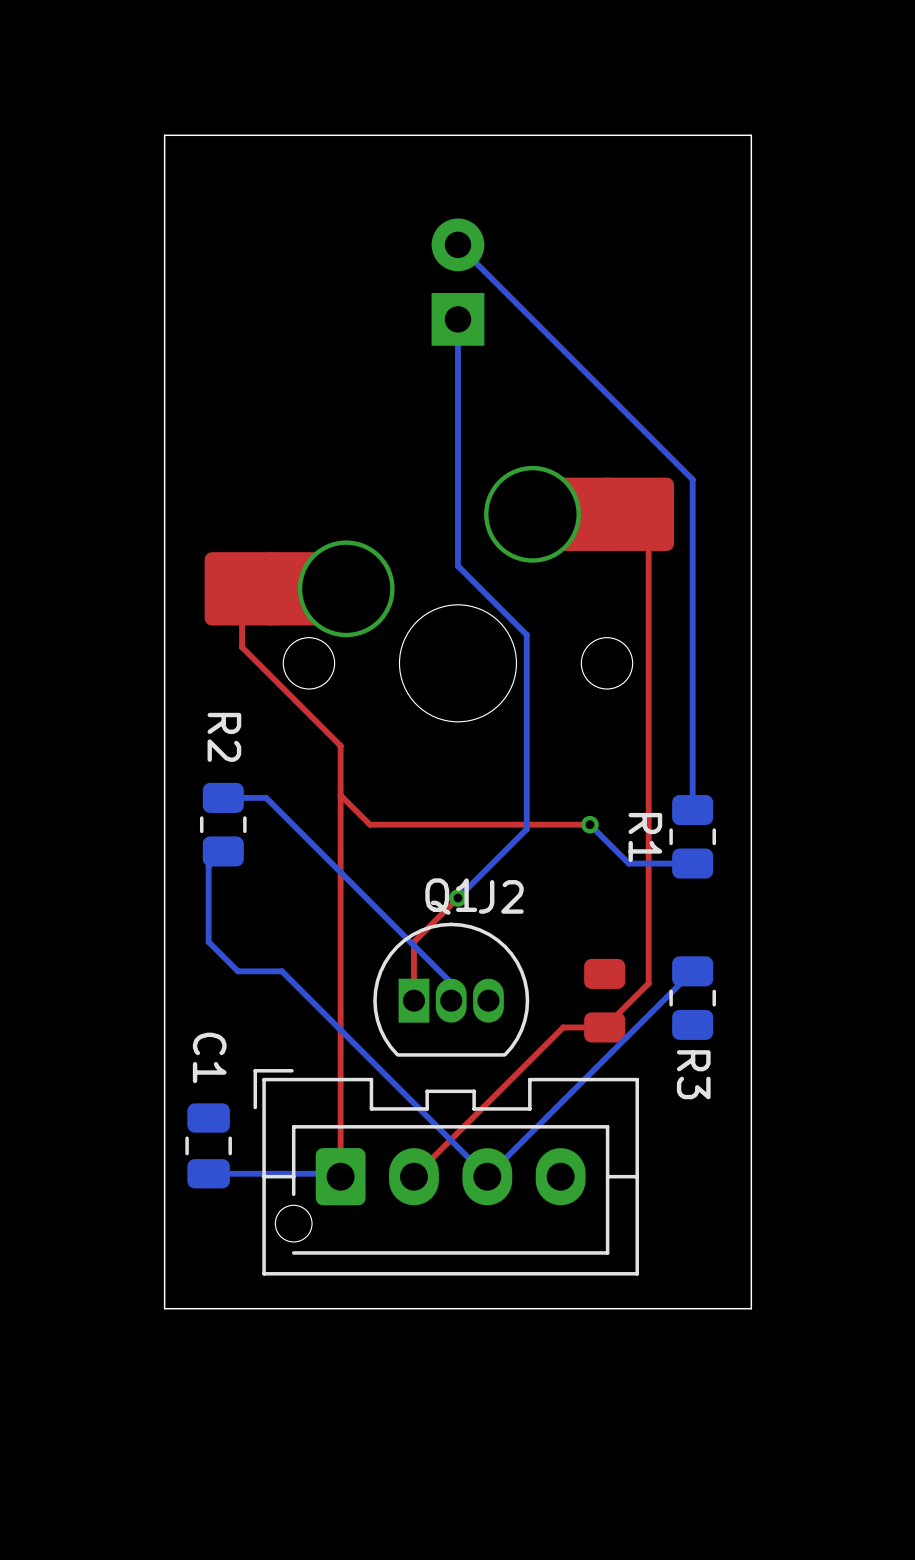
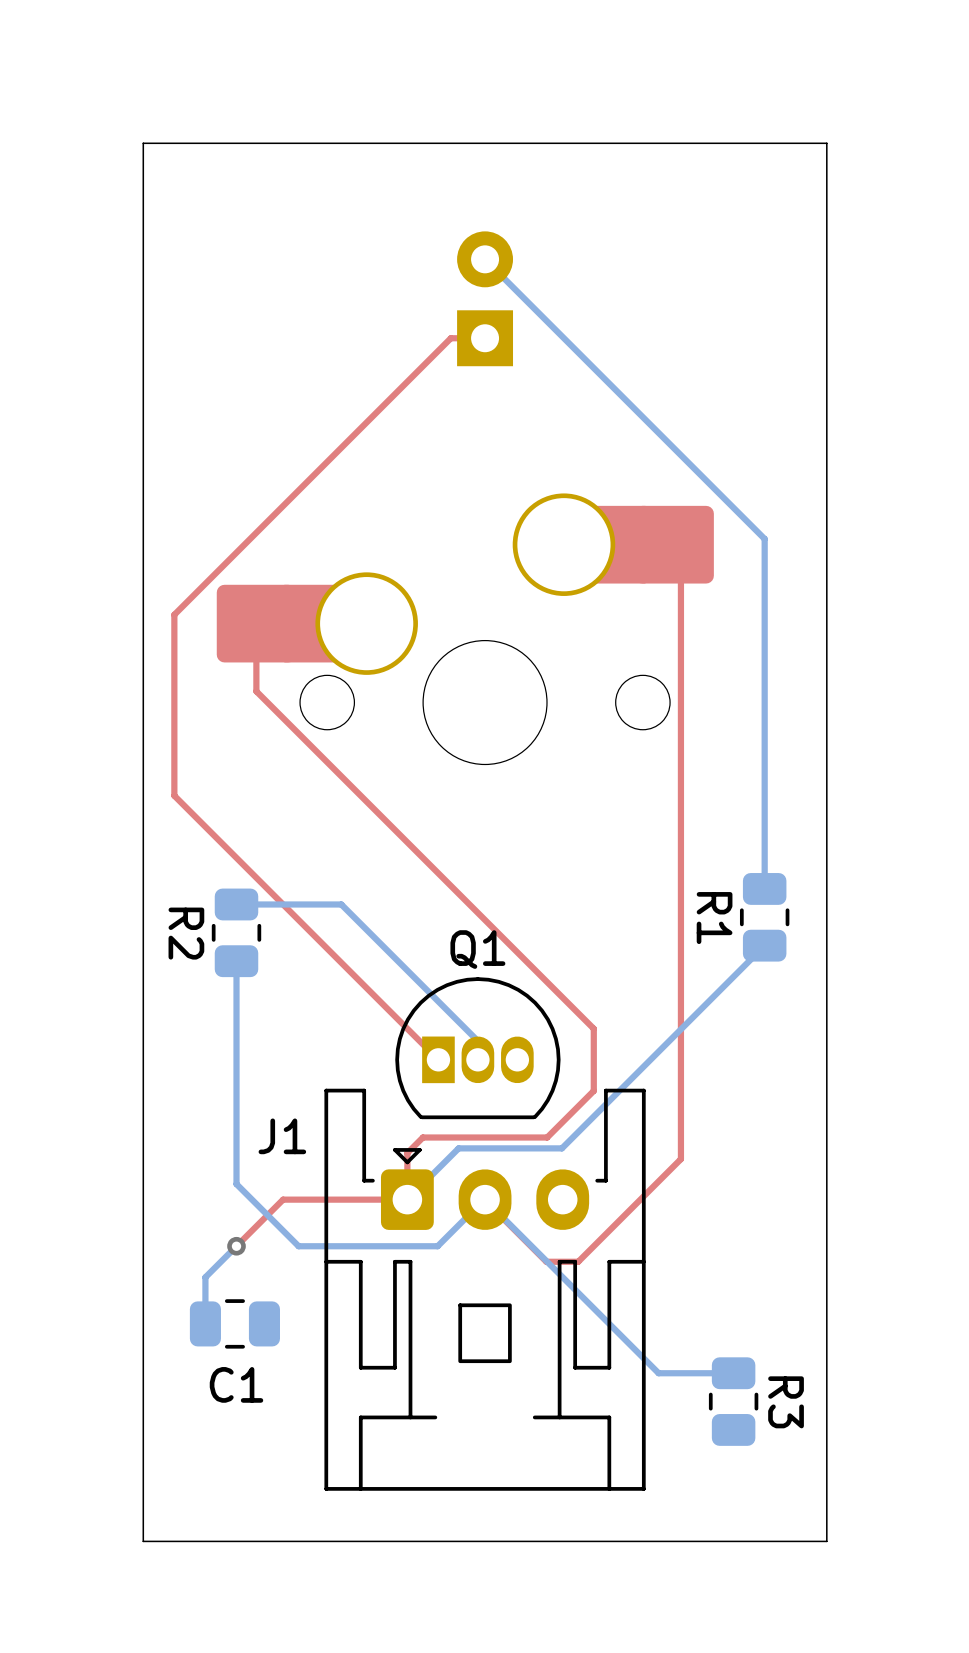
board edge: (751, 135) (751, 1308) (164, 1308) (164, 135) -> (795, 143) (826, 143) (826, 1541) (143, 1541) (143, 143) (174, 143)
bottom track: (457, 319) (457, 566) (526, 634) (526, 829) (457, 898) -> none
bottom track: (692, 479) (692, 810) -> (733, 507) (764, 538) (764, 888)
top track: (642, 520) (648, 526) (648, 983) (604, 1027) (563, 1027) (560, 1030) -> (680, 551) (680, 1159) (578, 1261) (546, 1261) (485, 1199)
top track: (242, 647) (340, 745) (340, 1176) -> (256, 685) (256, 691) (593, 1028) (593, 1090)
R2 name position: R2 (224, 737) -> R2 (186, 933)
top track: (340, 795) (369, 824) (589, 824) -> none
bottom track: (208, 797) (266, 797) (322, 854) -> (236, 904) (341, 904)
R2 position: (223, 824) -> (236, 932)
bottom track: (589, 824) (628, 863) (692, 863) -> none
via: (589, 824) -> none
R1 position: (692, 836) -> (764, 917)
bottom track: (223, 851) (208, 866) (208, 942) (237, 971) (281, 971) (487, 1176) (692, 971) -> none
bottom track: none -> (764, 945) (561, 1148) (458, 1148) (407, 1199)
top track: (457, 898) (413, 942) (413, 1000) -> (485, 338) (450, 338) (174, 614) (174, 795) (438, 1059)
via: (457, 898) -> none
bottom track: none -> (236, 961) (236, 1184) (298, 1246) (437, 1246) (484, 1199)
R3 position: (692, 998) -> (733, 1401)
part: (604, 1000) -> none
C1 name position: C1 (209, 1057) -> C1 (236, 1384)
top track: (516, 1074) (413, 1176) -> (547, 1137) (422, 1137) (407, 1153) (407, 1199) (283, 1199) (236, 1246)
R3 name position: R3 (693, 1074) -> R3 (786, 1402)
bottom track: none -> (485, 1199) (658, 1373) (733, 1373)
C1 rotation: 0° (208, 1145) -> 90° clockwise (234, 1323)
C1 position: (208, 1145) -> (234, 1323)
J2: (446, 1172) -> none
bottom track: (208, 1173) (337, 1173) (340, 1176) -> none
bottom track: none -> (236, 1246) (205, 1277) (205, 1323)
via: none -> (236, 1246)
J1: none -> (485, 1289)

